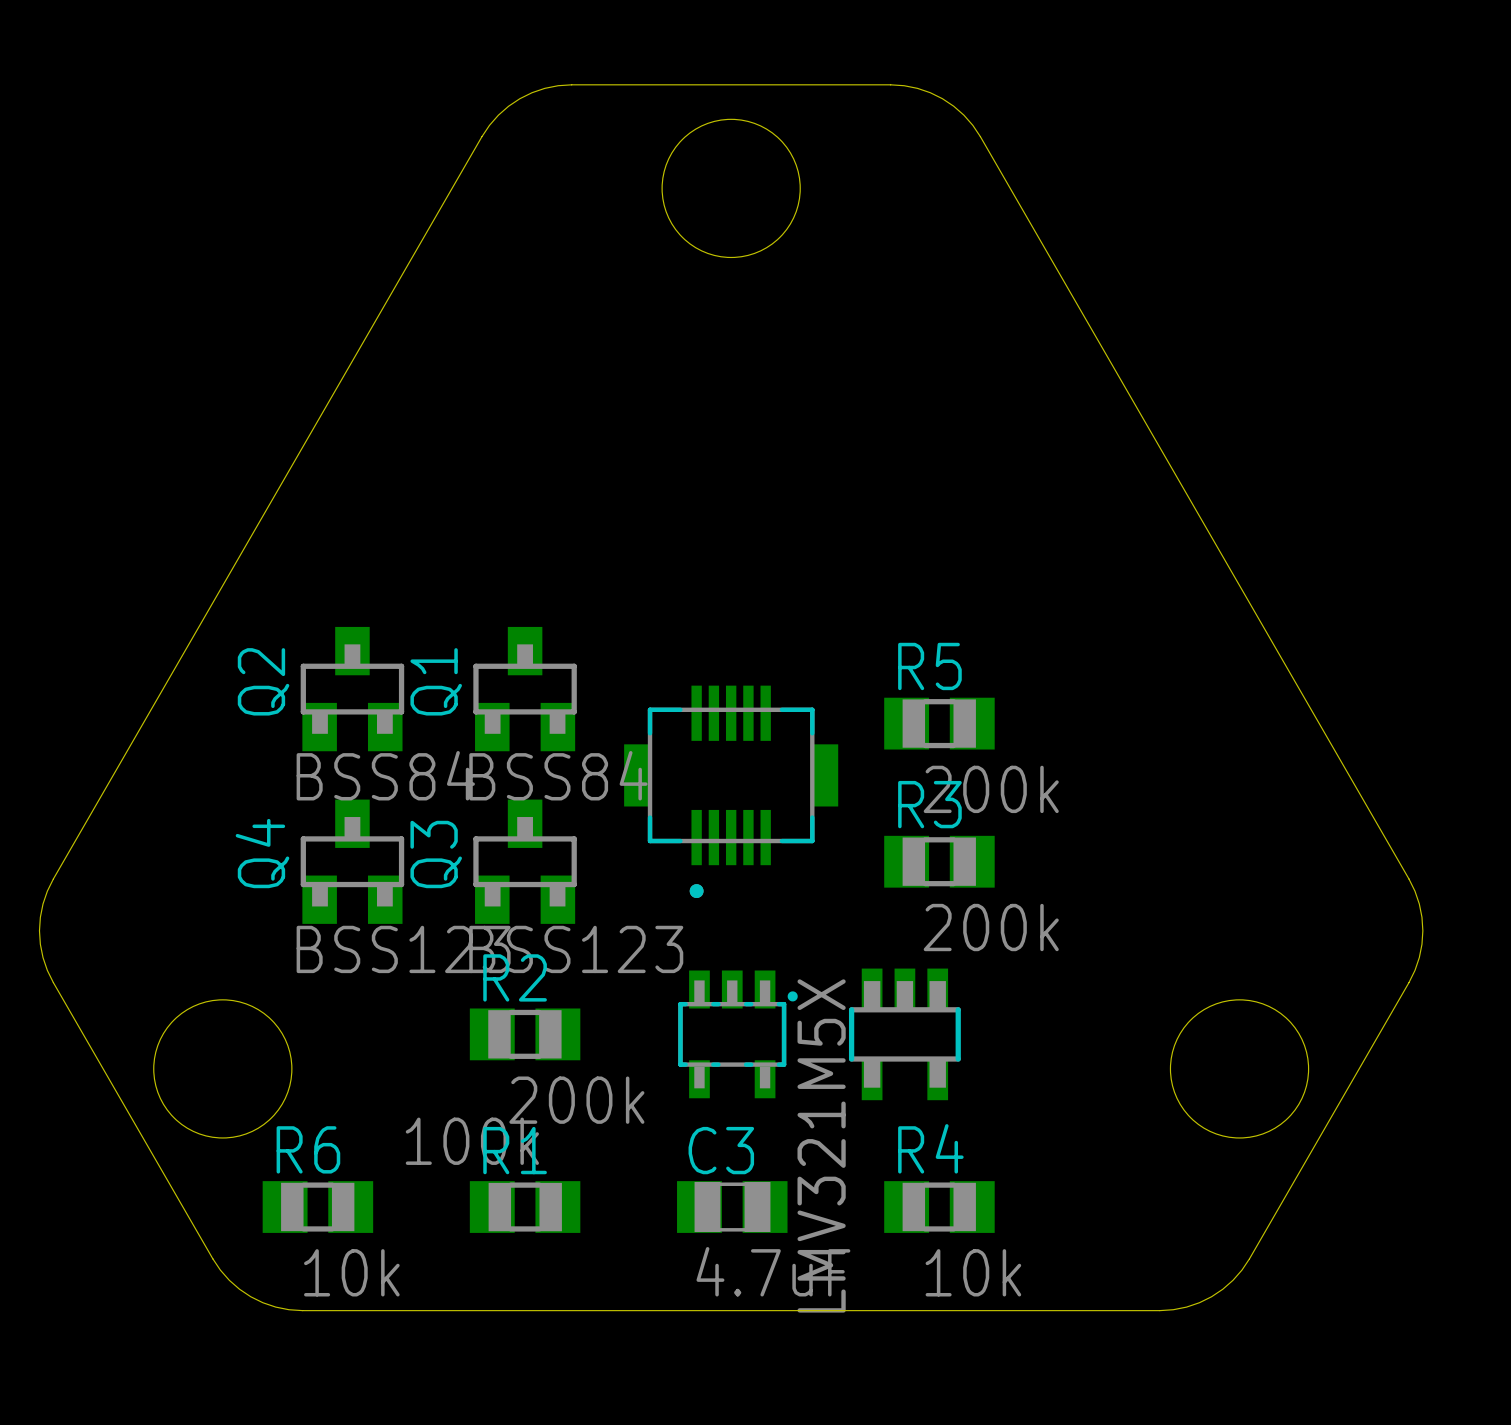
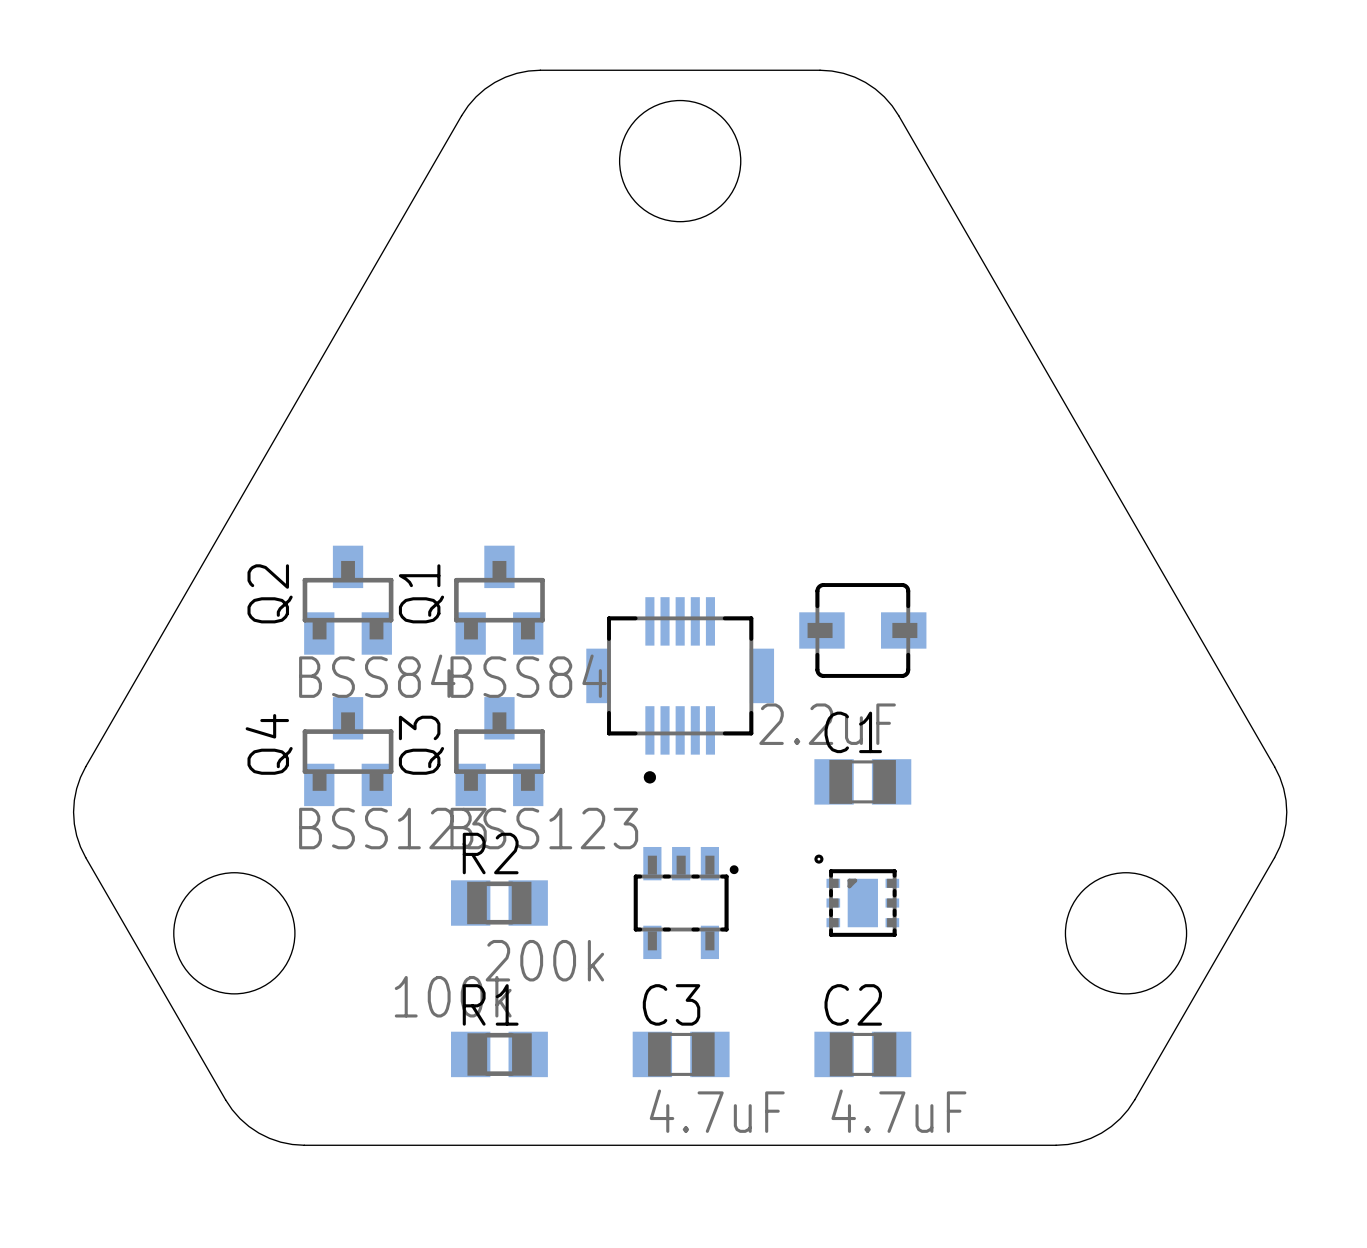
R5: 200k (939, 723) -> none
part: none -> (862, 630)
R3: 200k (939, 861) -> none
C1: none -> 2.2uF (862, 781)
part footprint: [848, 968, 961, 1101] -> [814, 854, 900, 937]
part value: LMV321M5X (821, 1145) -> none
R6: 10k (317, 1207) -> none
R4: 10k (939, 1207) -> none
C2: none -> 4.7uF (862, 1054)

